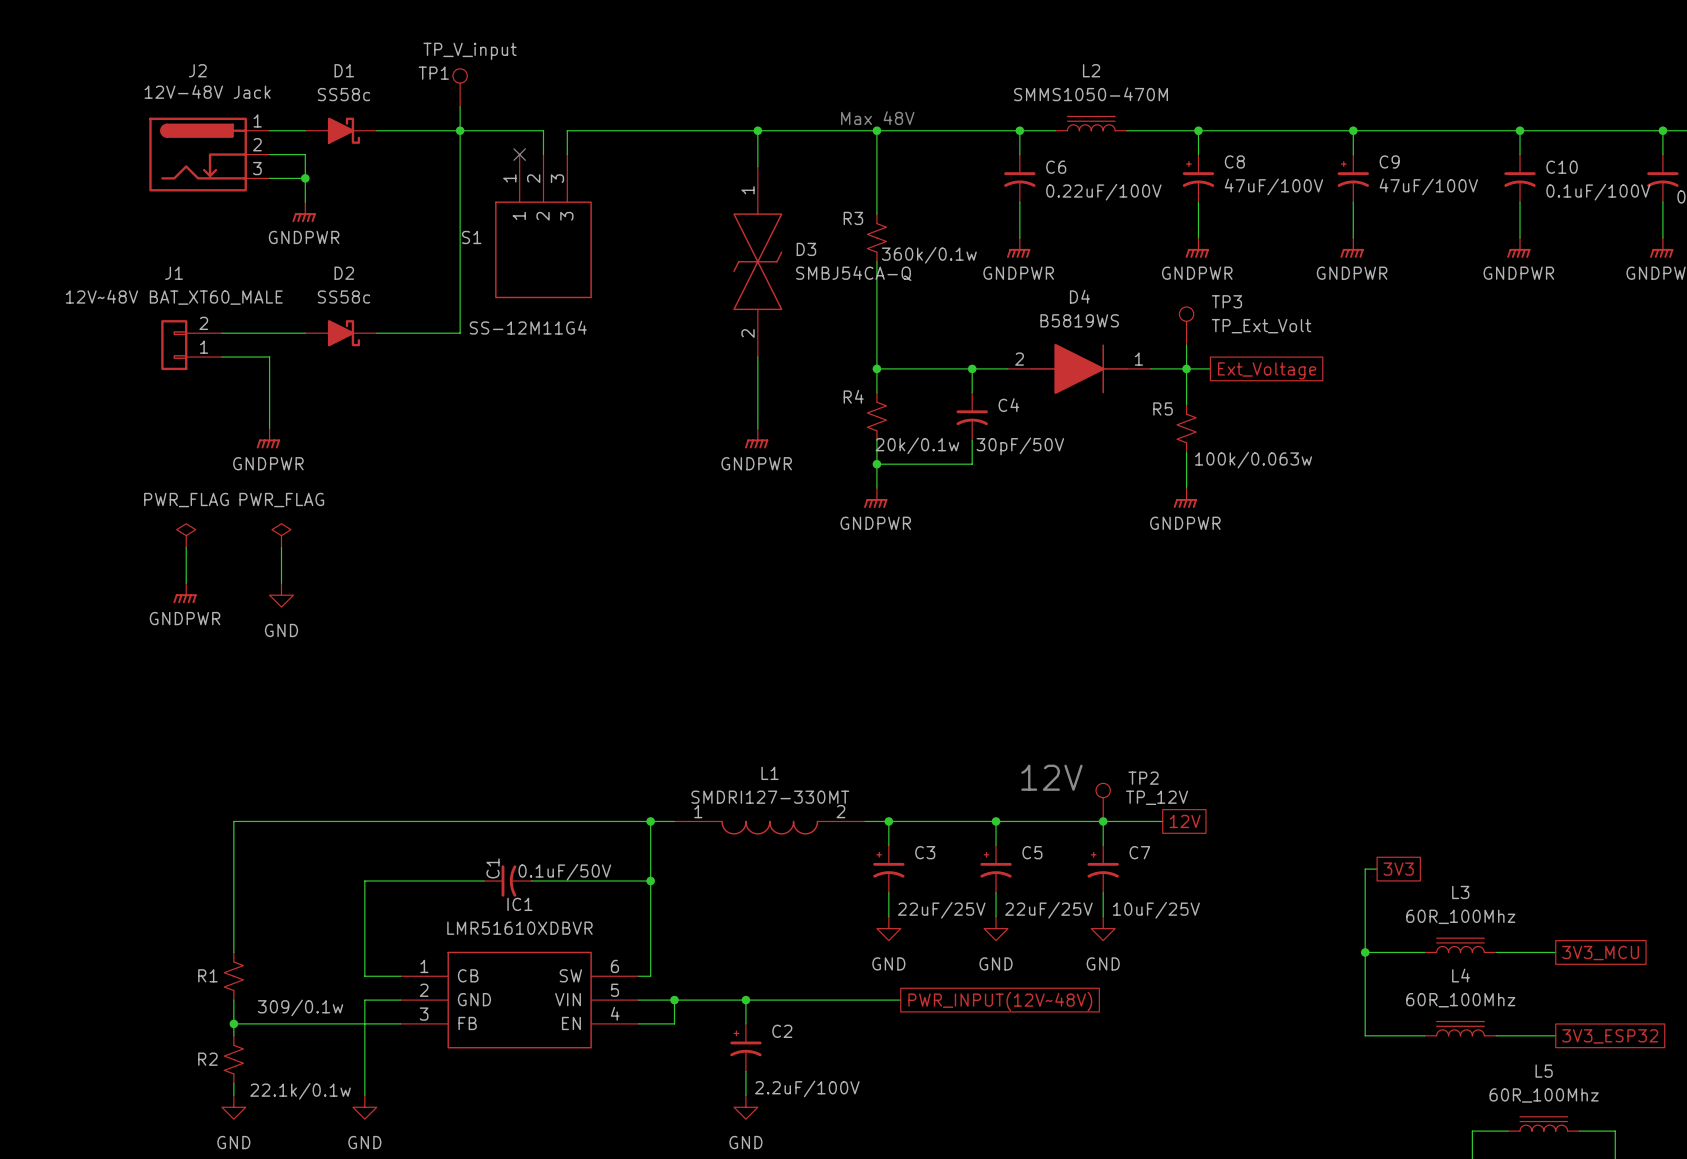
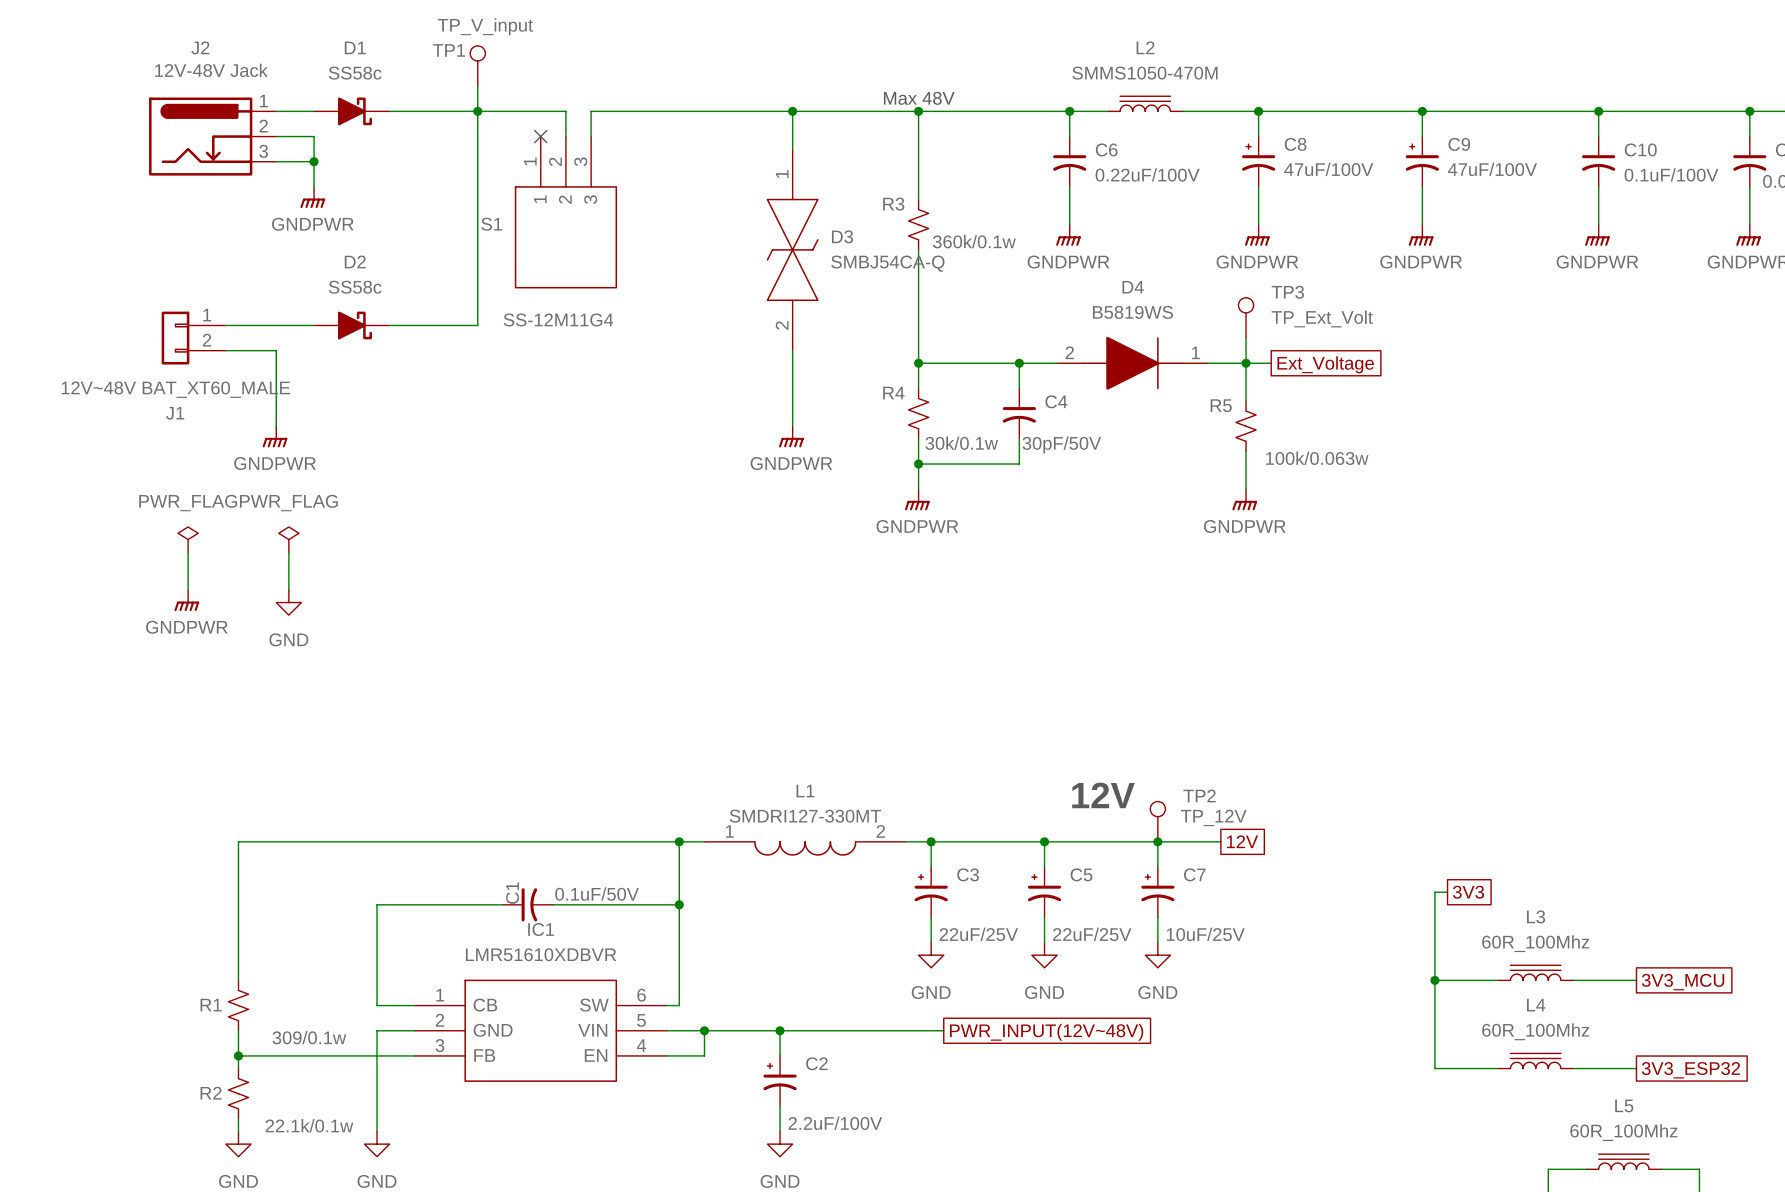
J1 flip: as is (174, 345) -> up-down (175, 338)
R4 value: 20k/0.1w (917, 445) -> 30k/0.1w (961, 443)

